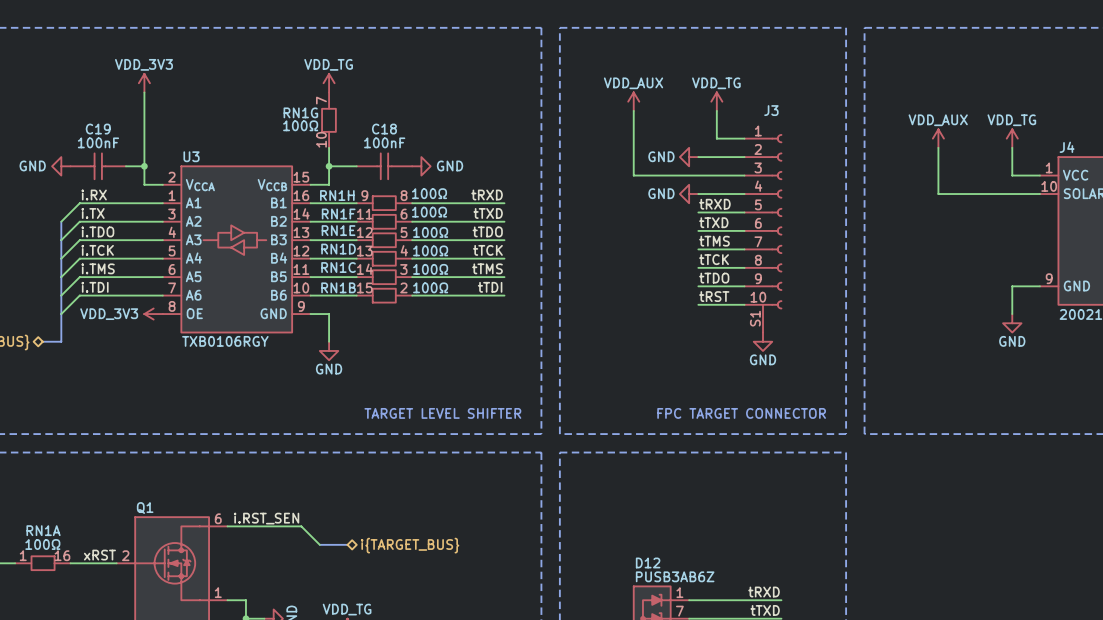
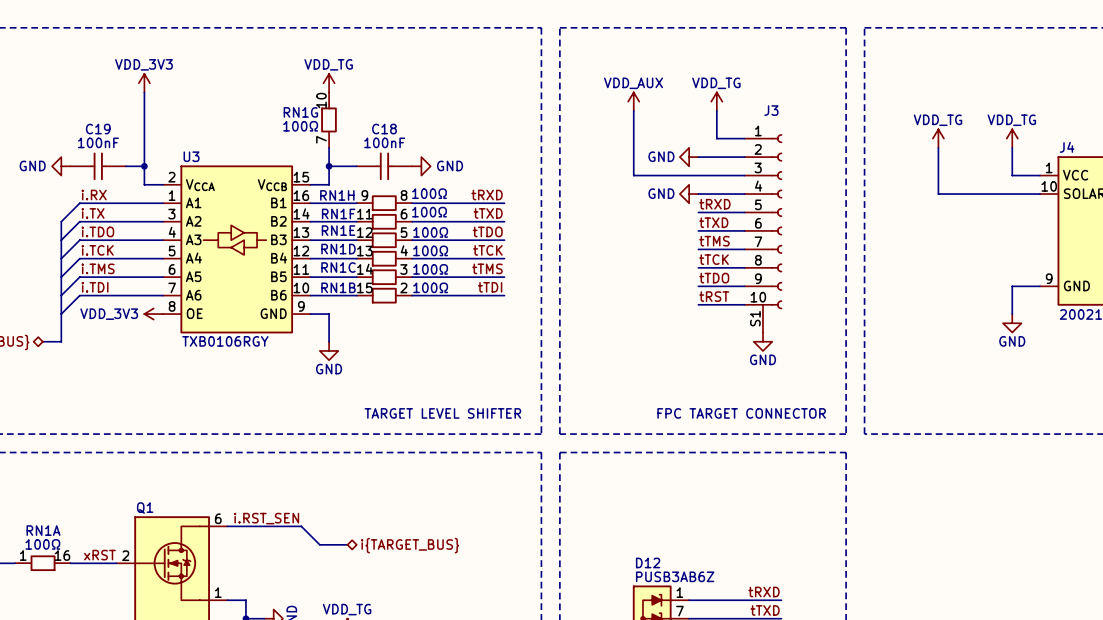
RN1G rotation: 0° (328, 120) -> 180° (328, 119)
power symbol: VDD_AUX (938, 138) -> VDD_TG (938, 138)

